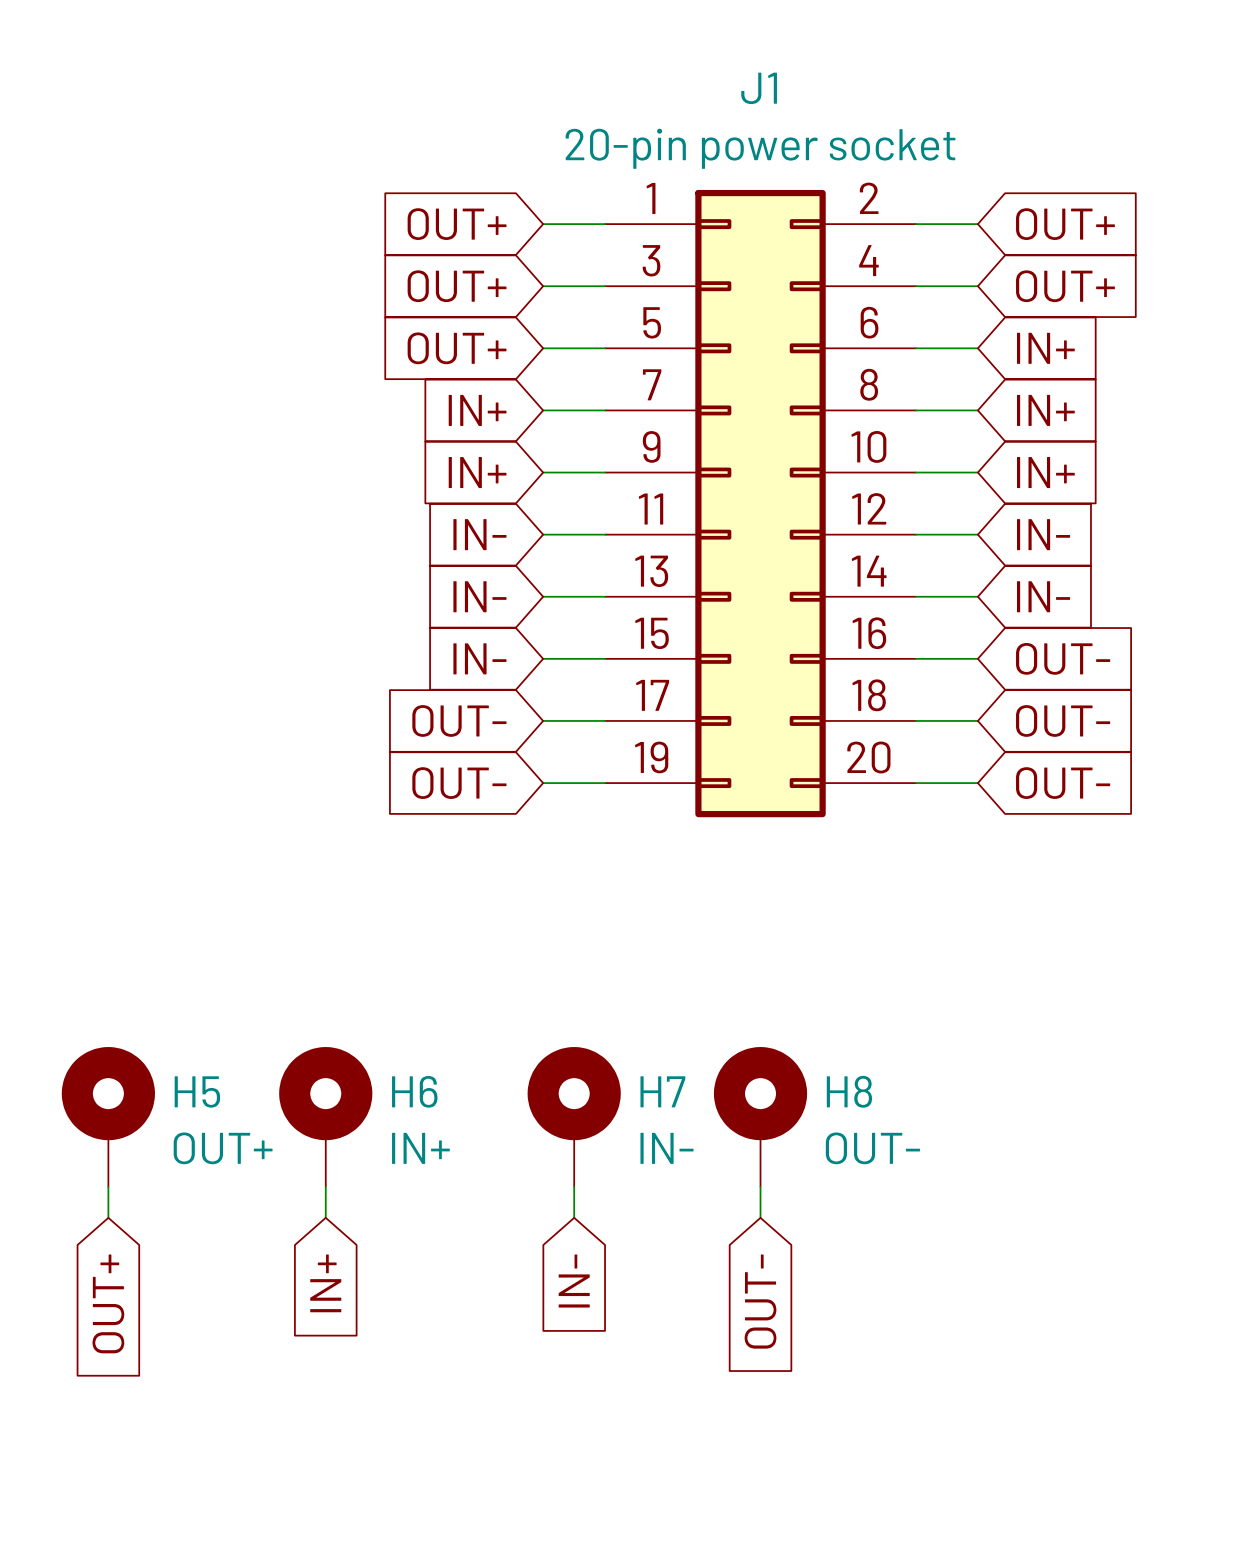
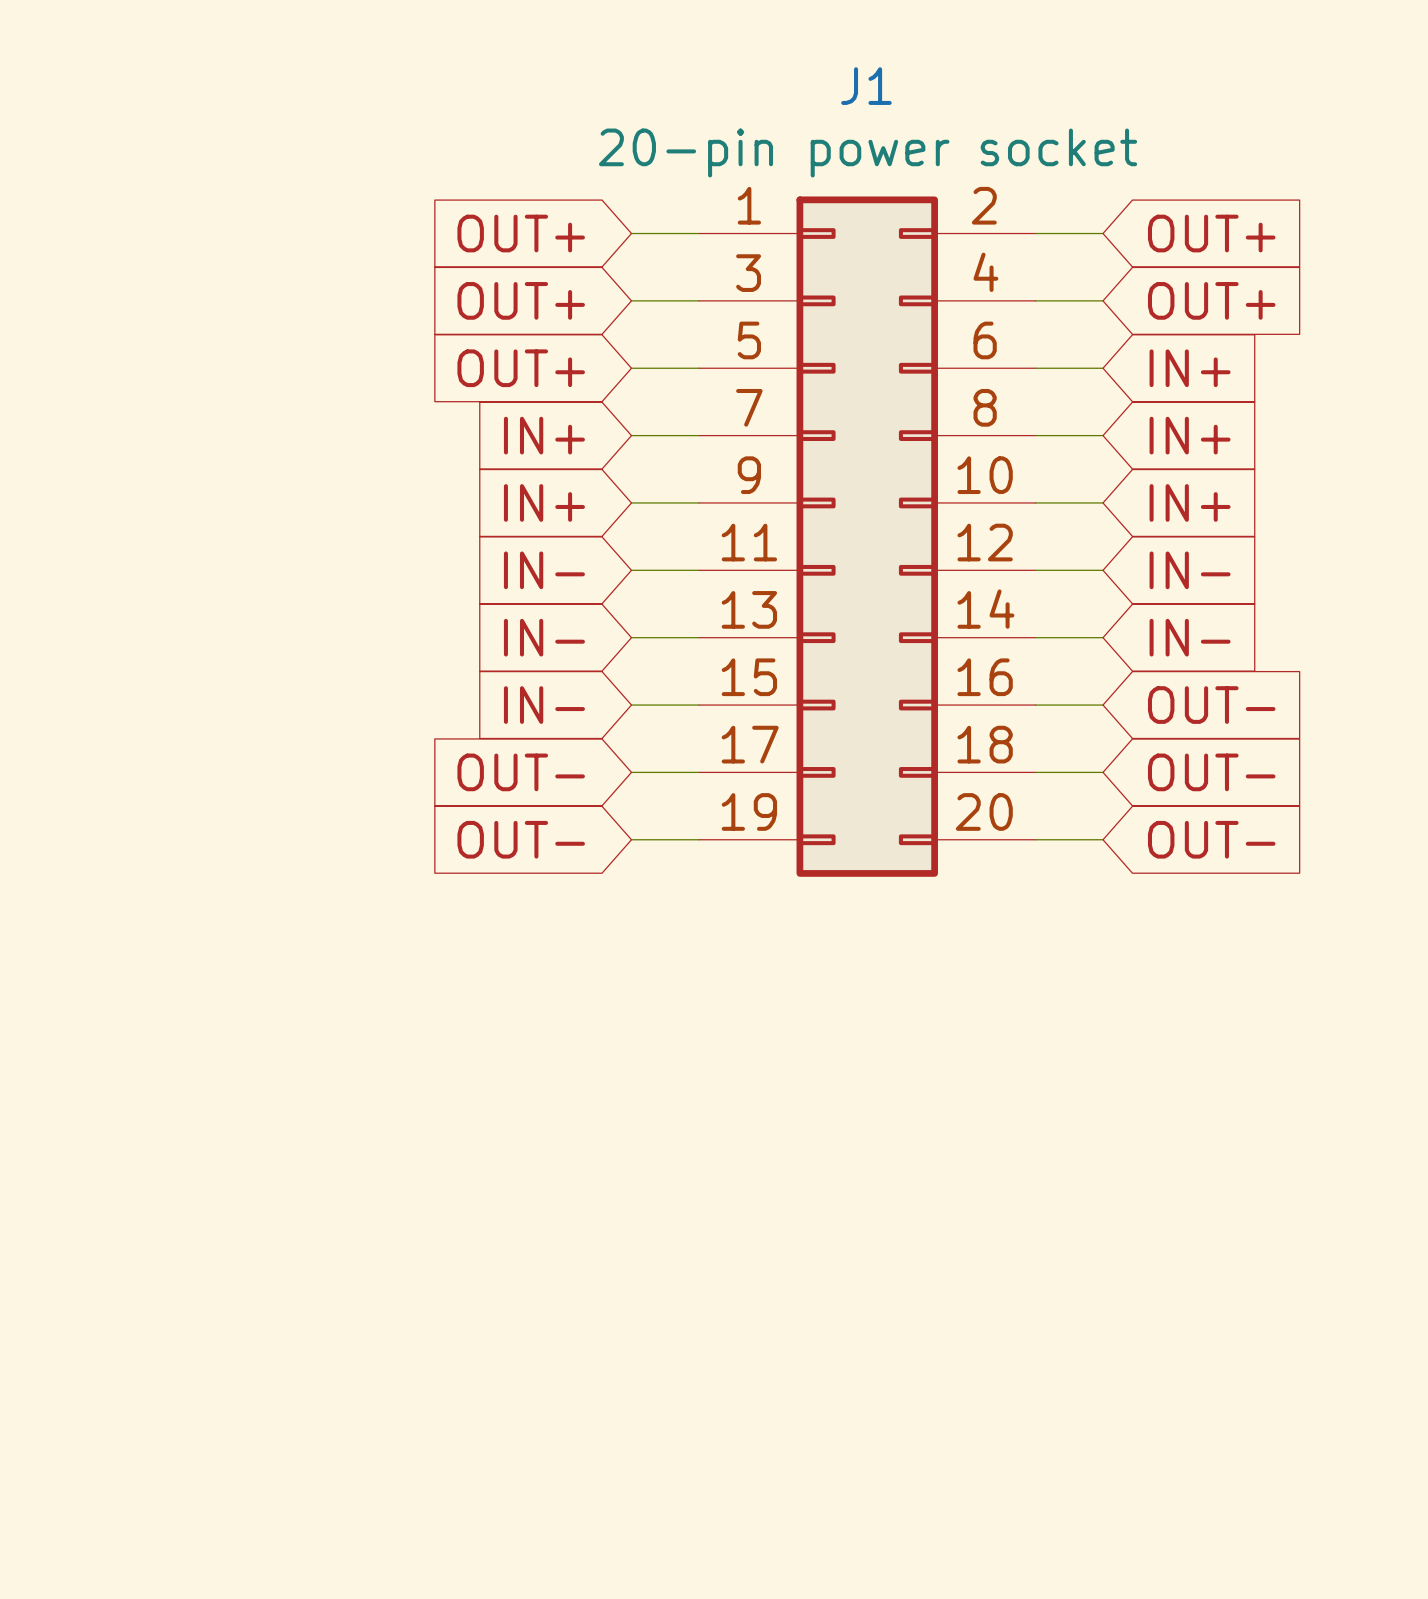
H5: OUT+ (108, 1116) -> none
H6: IN+ (325, 1116) -> none
H7: IN- (574, 1116) -> none
H8: OUT- (760, 1116) -> none
wire: (108, 1186) (108, 1217) -> none
wire: (325, 1186) (325, 1217) -> none
wire: (574, 1186) (574, 1217) -> none
wire: (760, 1186) (760, 1217) -> none
global label: IN- (574, 1281) -> none
global label: IN+ (325, 1283) -> none
global label: OUT- (760, 1301) -> none
global label: OUT+ (108, 1303) -> none

